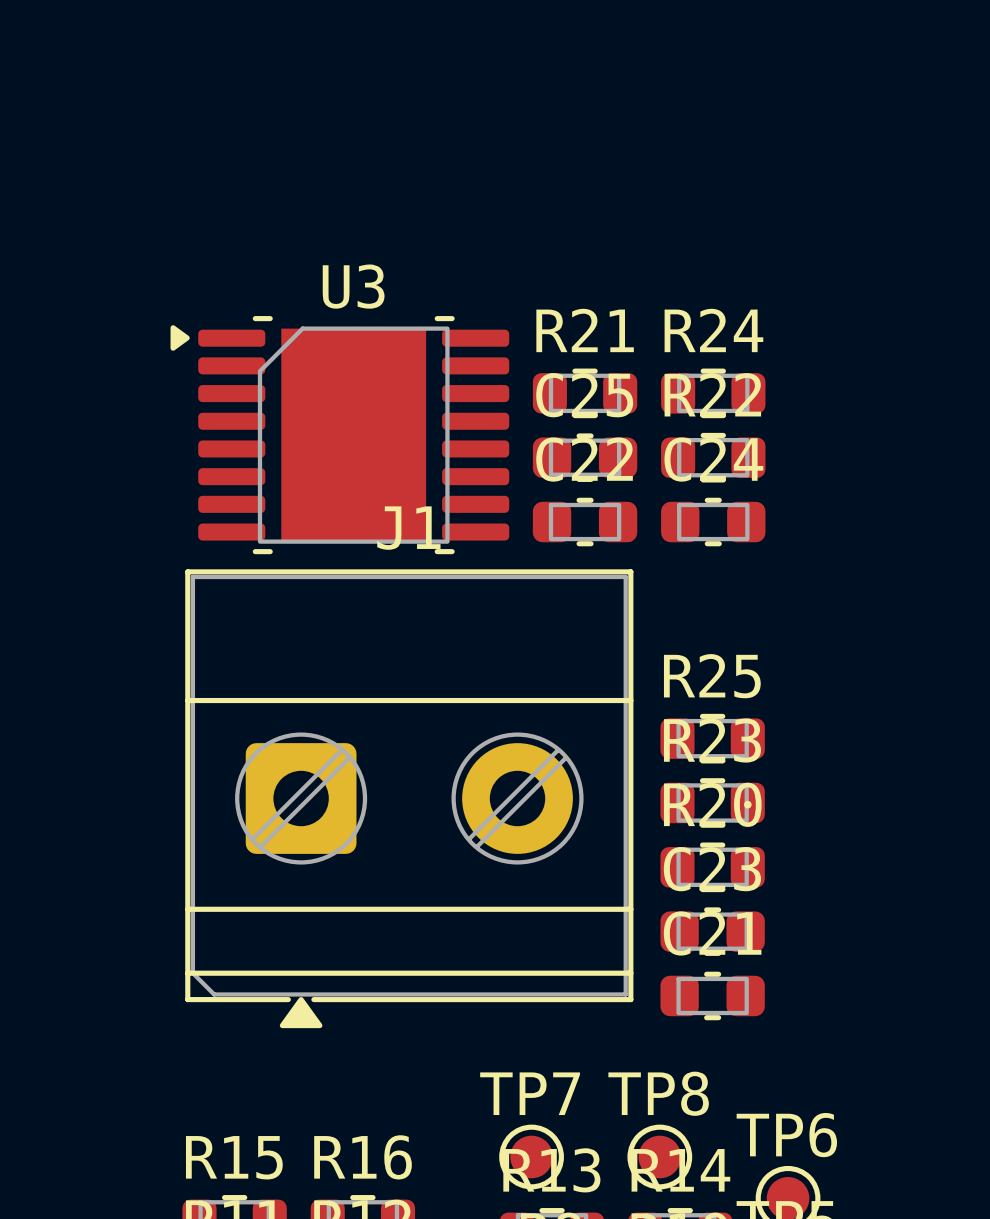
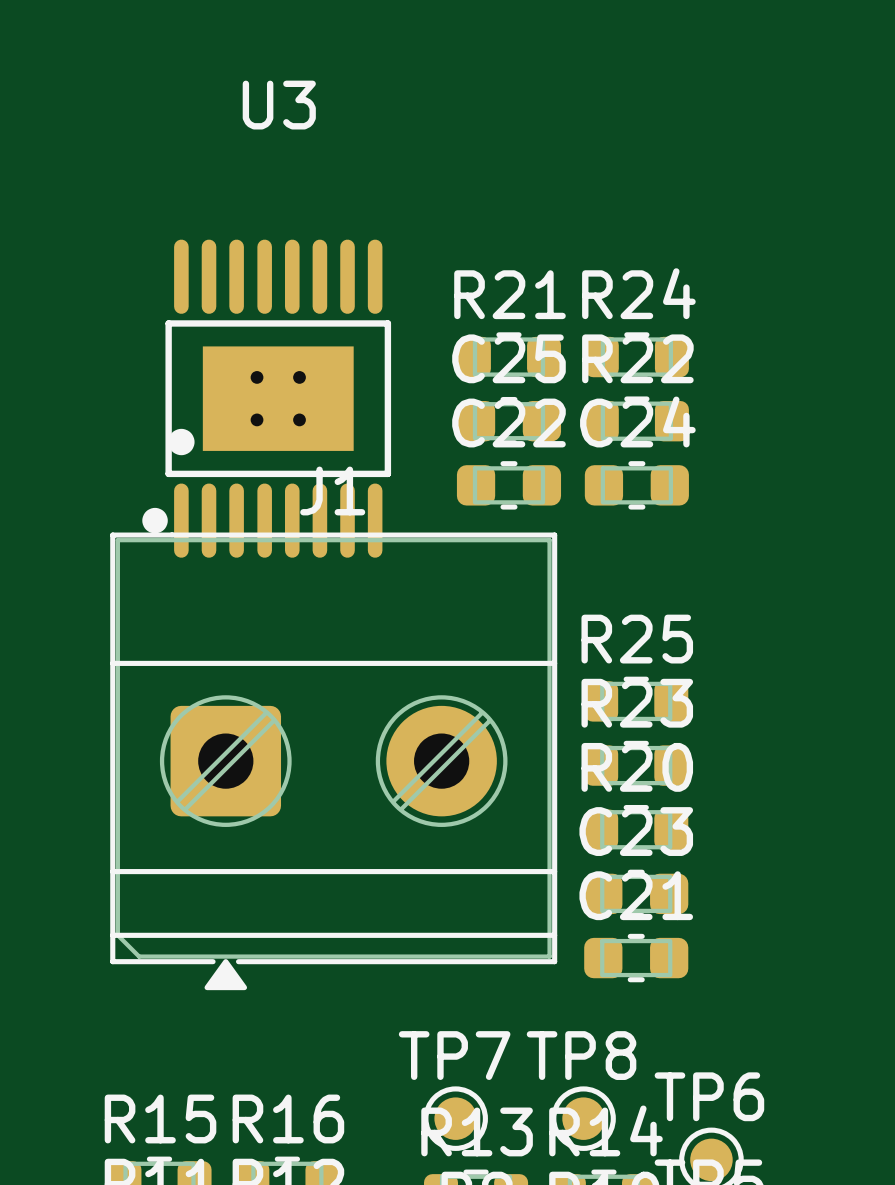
U3 name position: U3 (353, 286) -> U3 (279, 105)
U3 footprint: [170, 316, 510, 555] -> [142, 239, 392, 558]

